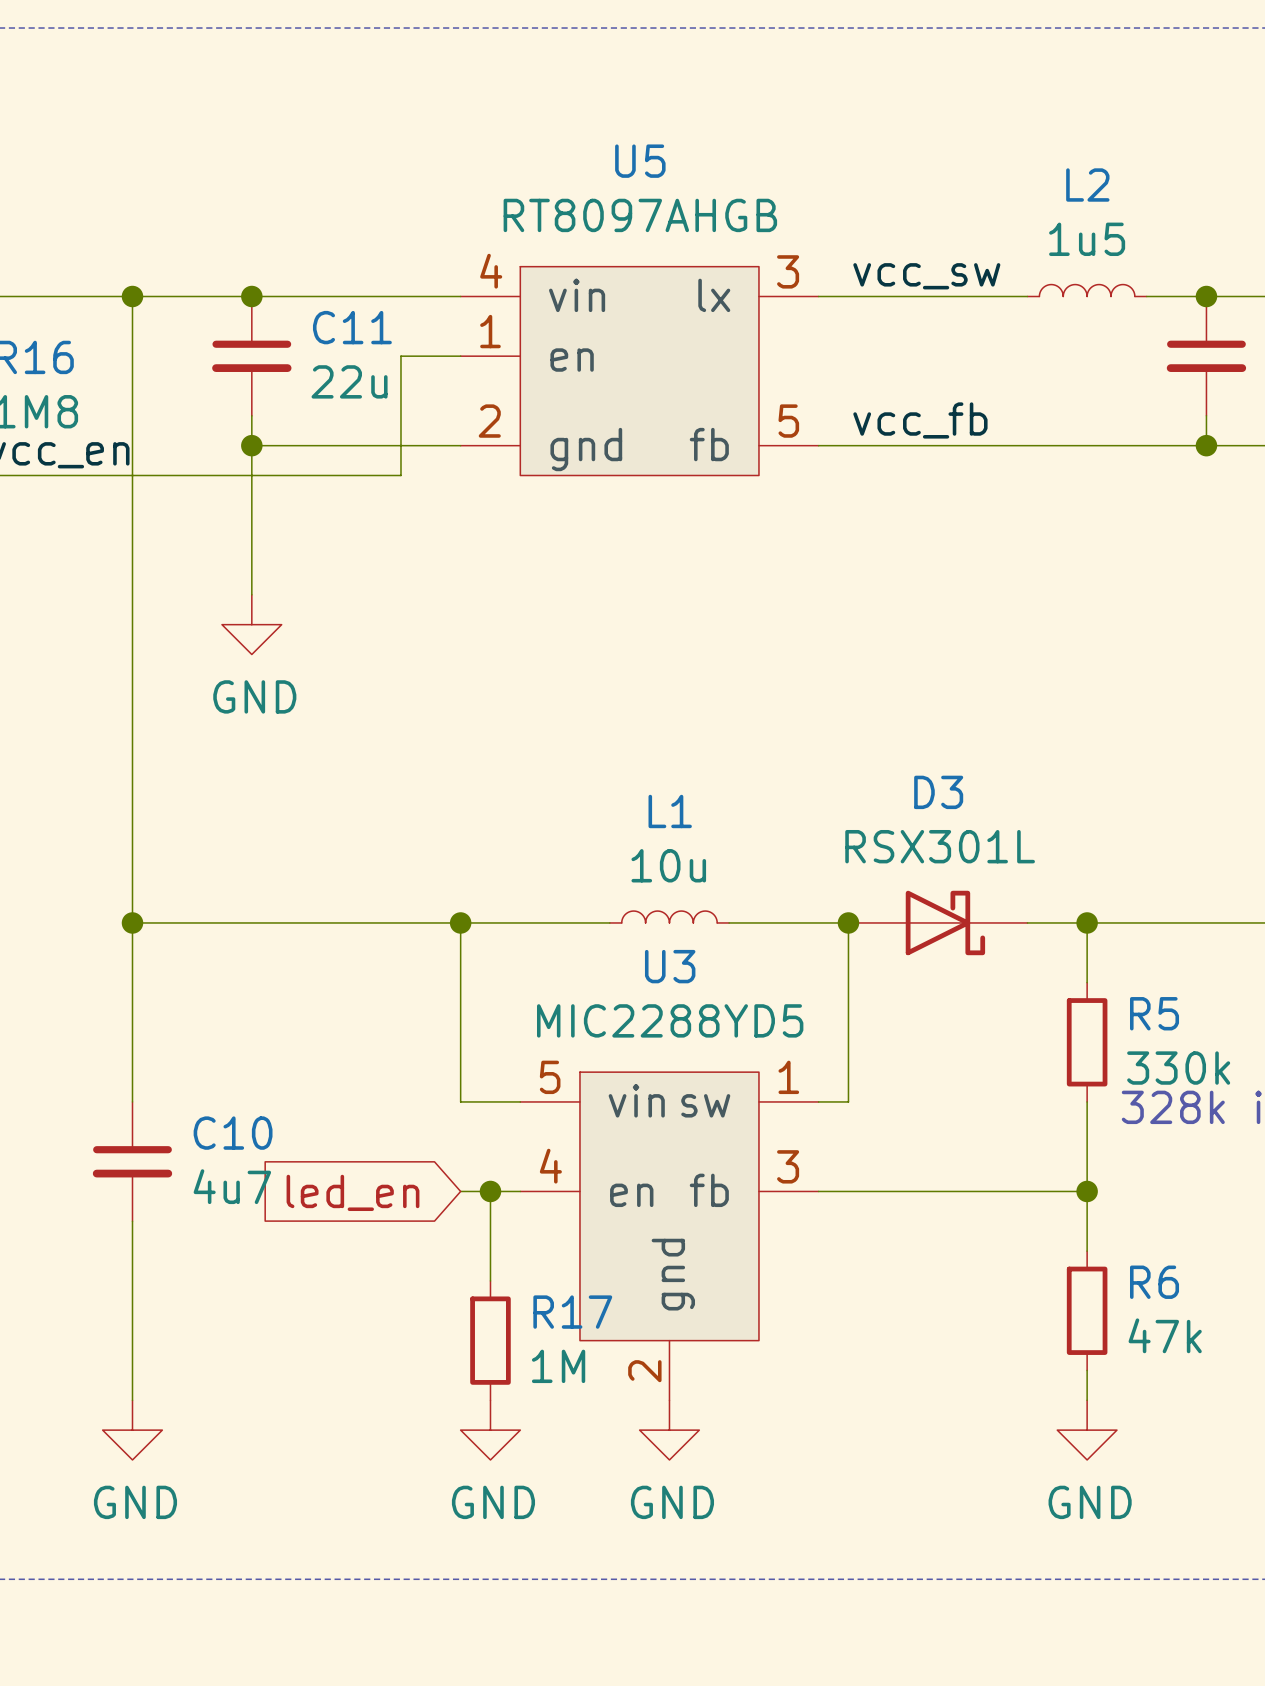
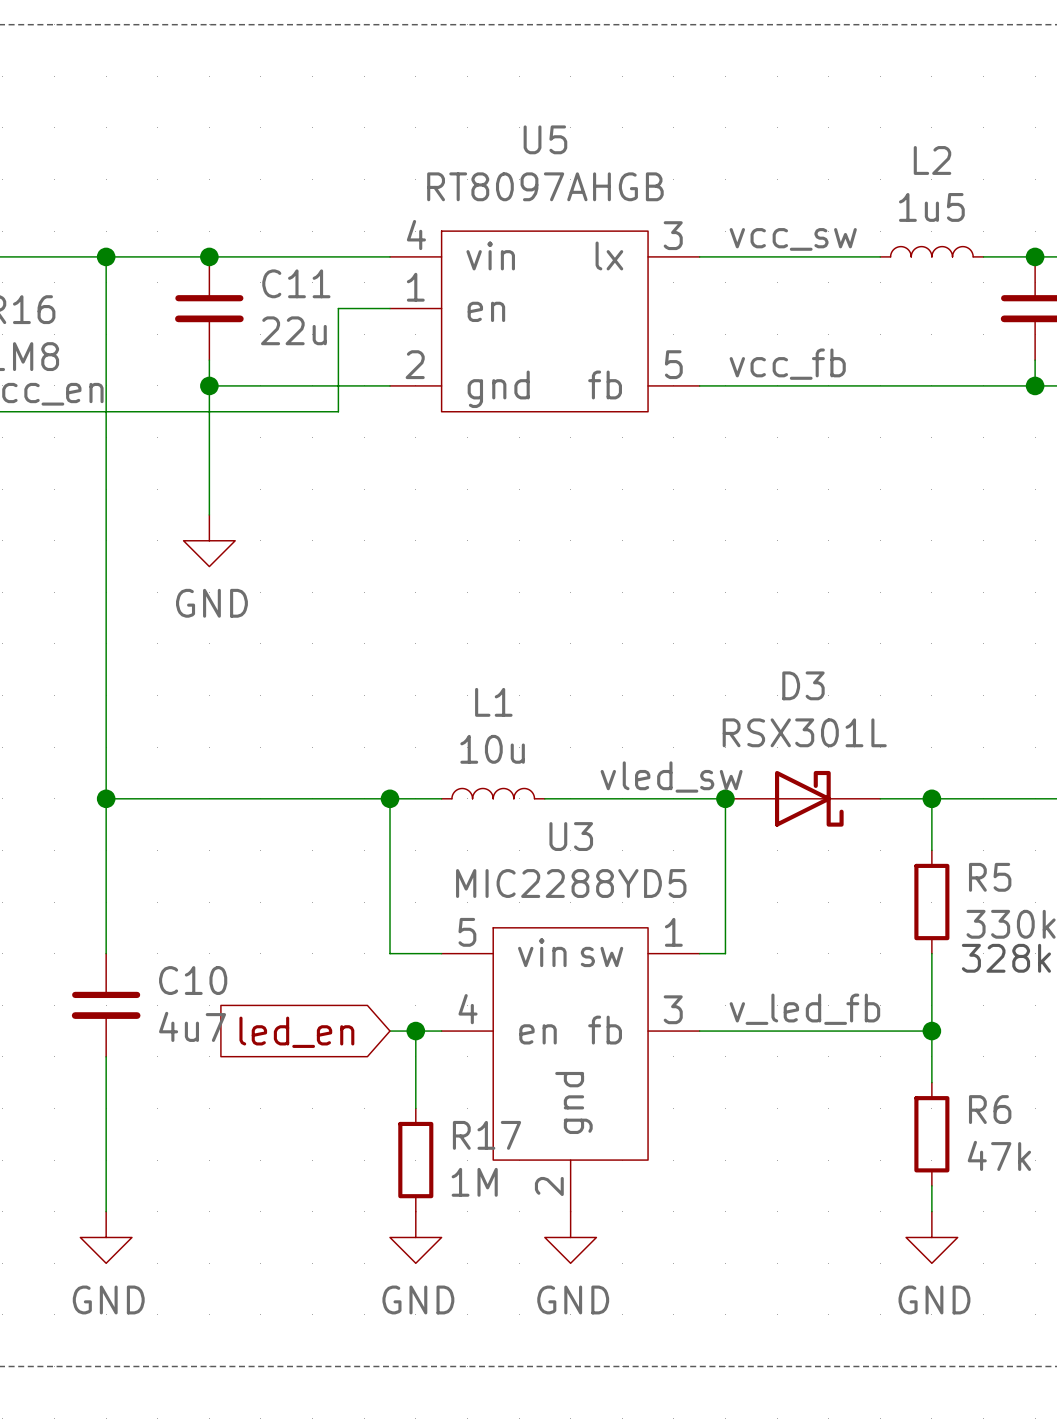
label: none -> vled_sw (671, 777)
L1 position: (669, 917) -> (493, 793)
wire: (520, 922) (609, 922) -> (544, 798) (622, 798)
label: none -> v_led_fb (804, 1009)

